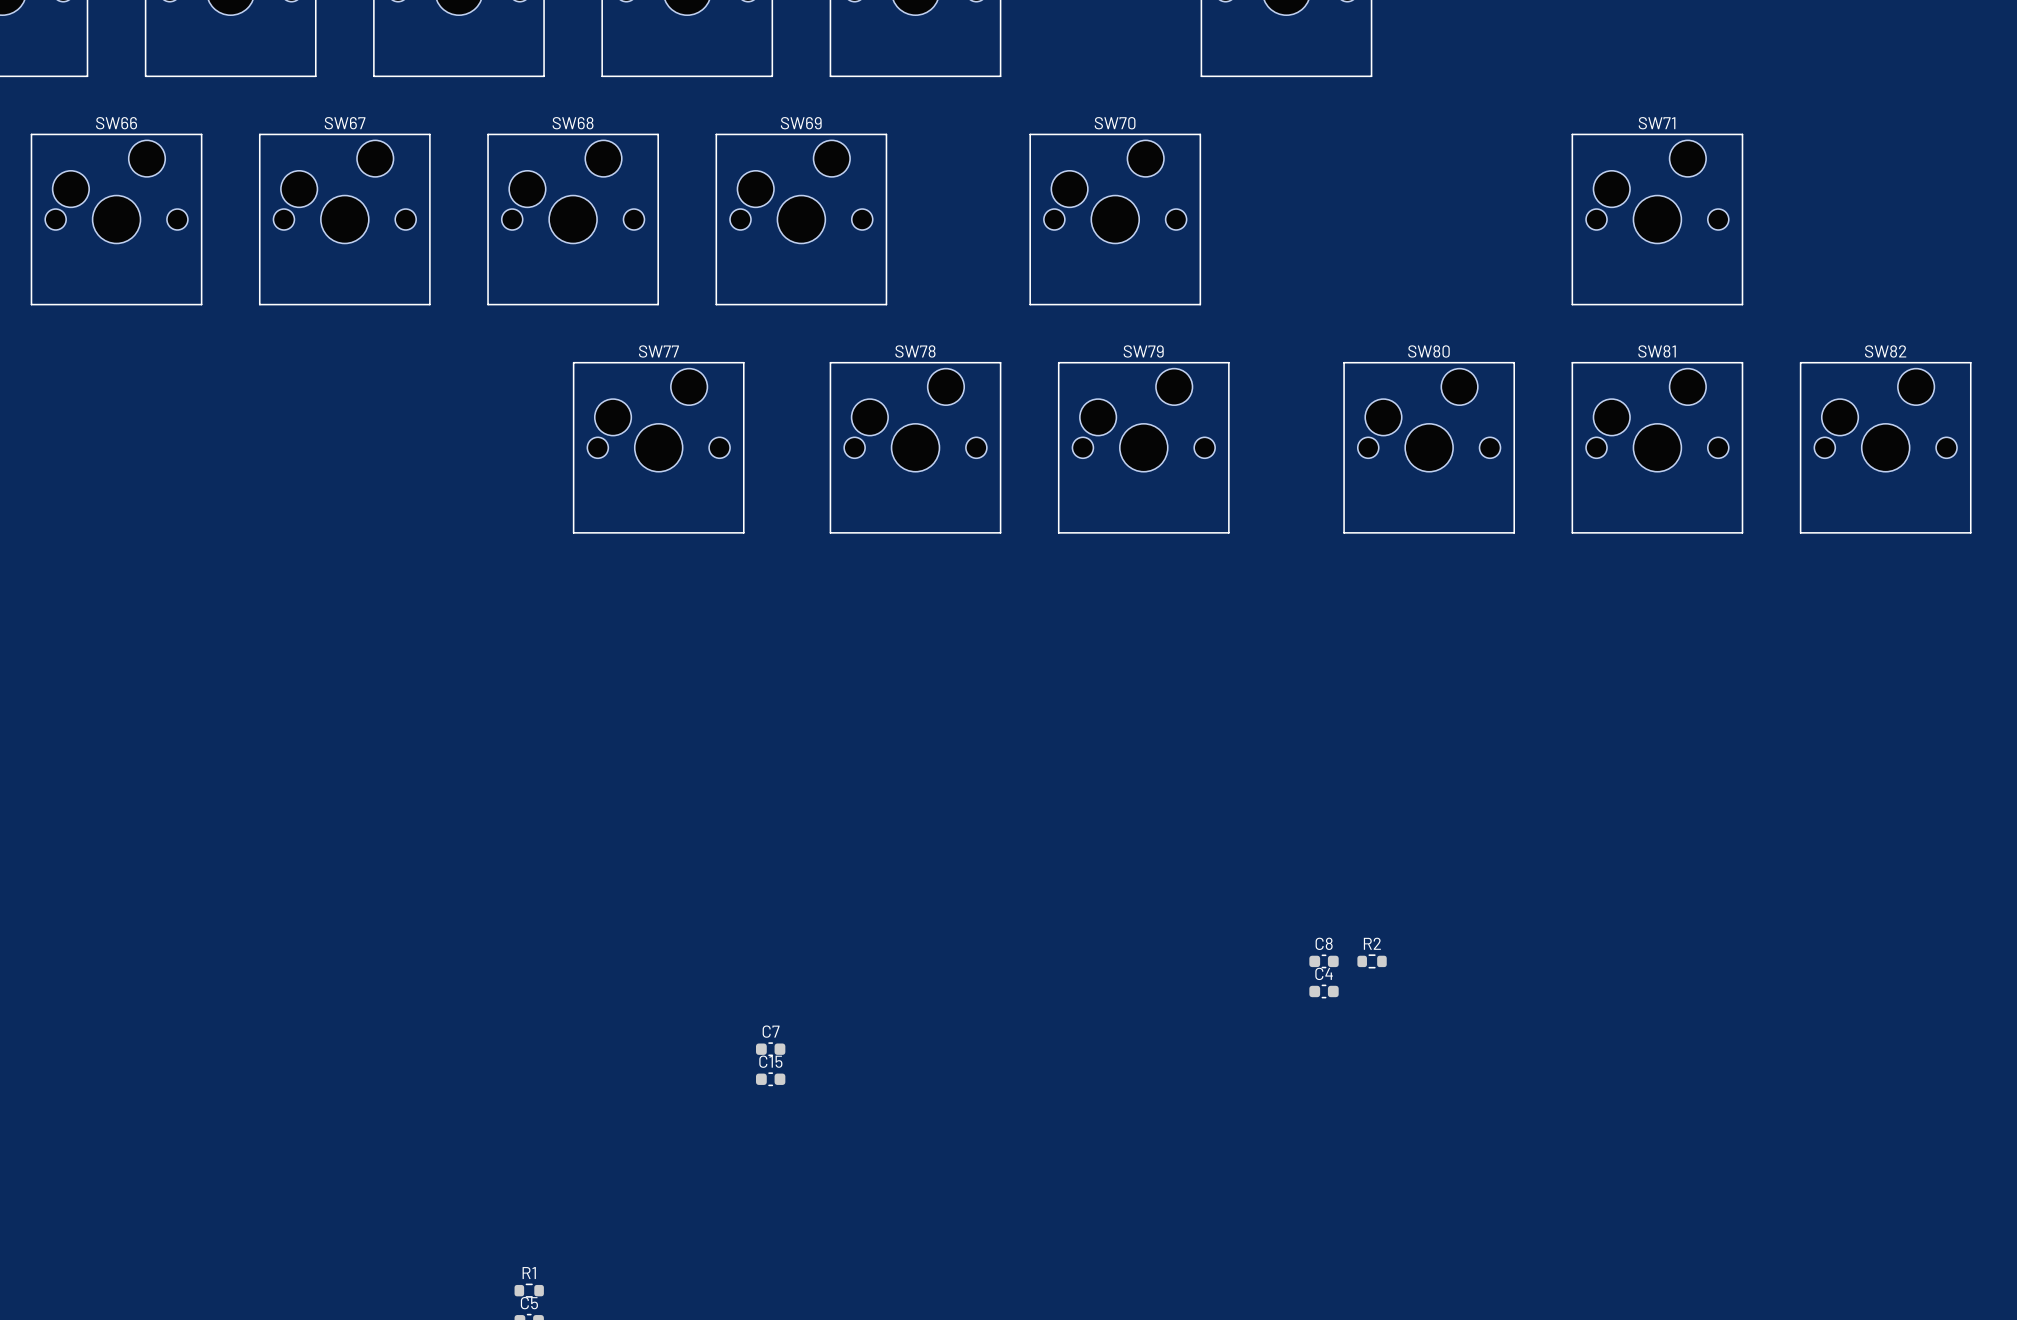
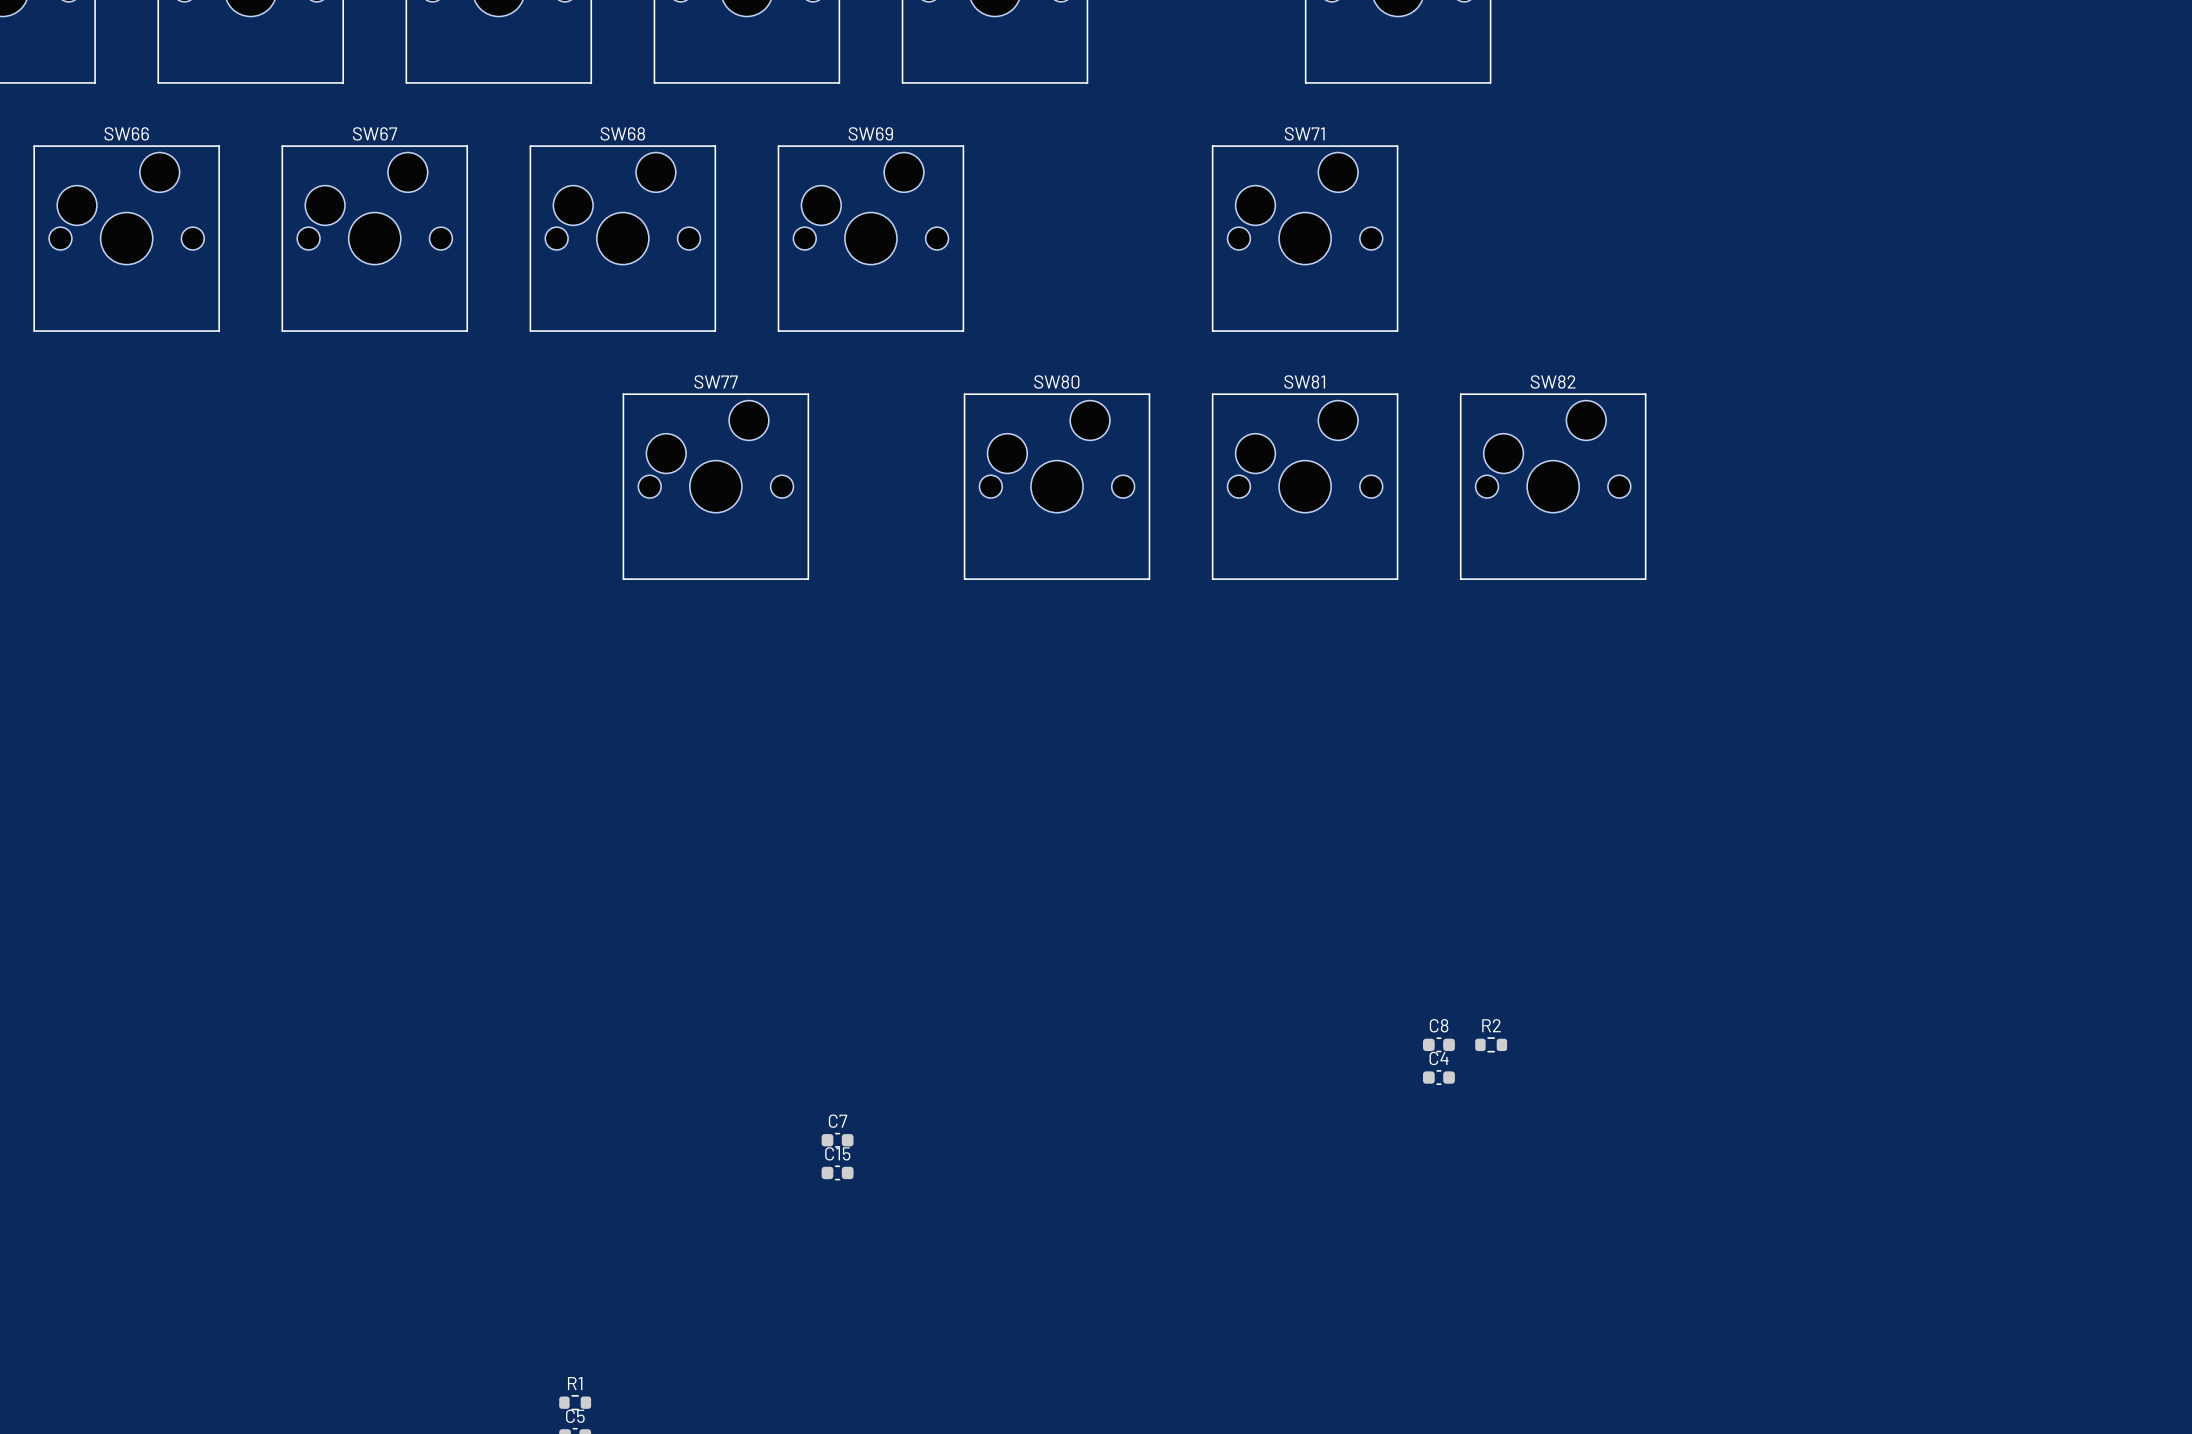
SW70: (1115, 219) -> none
SW71 position: (1657, 219) -> (1305, 238)
SW80 name: SW80 (1428, 351) -> SW82 (1553, 381)
SW78: (915, 447) -> none
SW80: none -> (1057, 486)
SW79: (1143, 447) -> none
SW81 position: (1657, 447) -> (1305, 486)
SW82: (1885, 447) -> none

